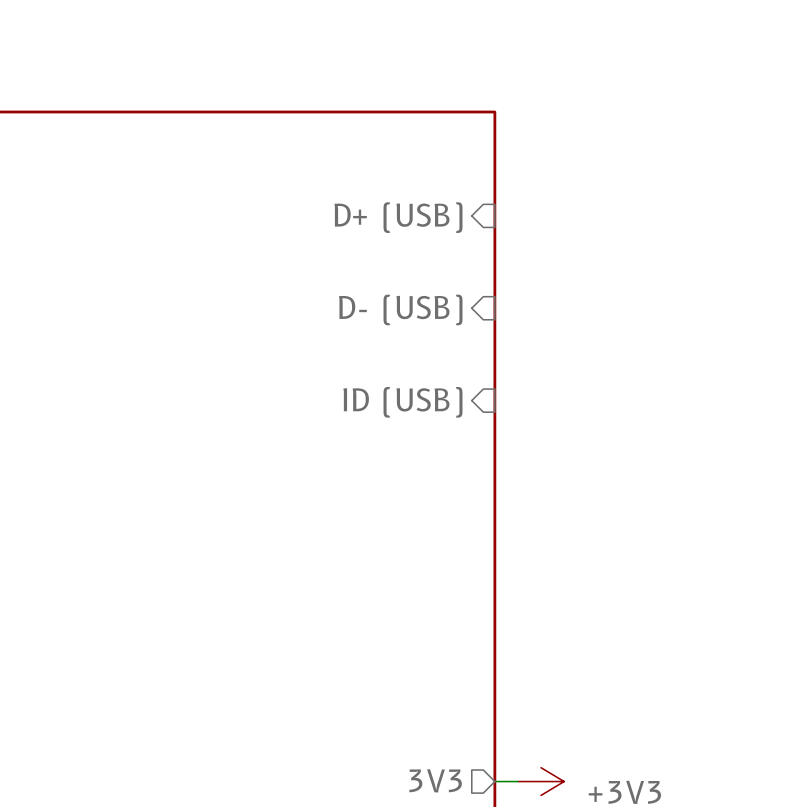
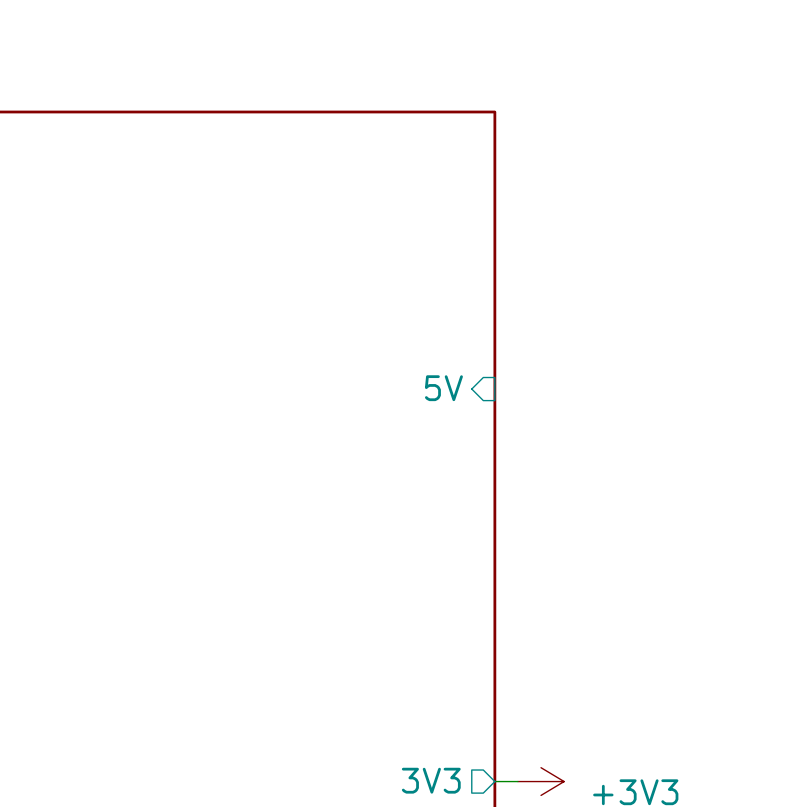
sheet pin: D+ (USB) (398, 217) -> none
sheet pin: D- (USB) (400, 309) -> none
sheet pin: ID (USB) (402, 402) -> 5V (443, 388)

